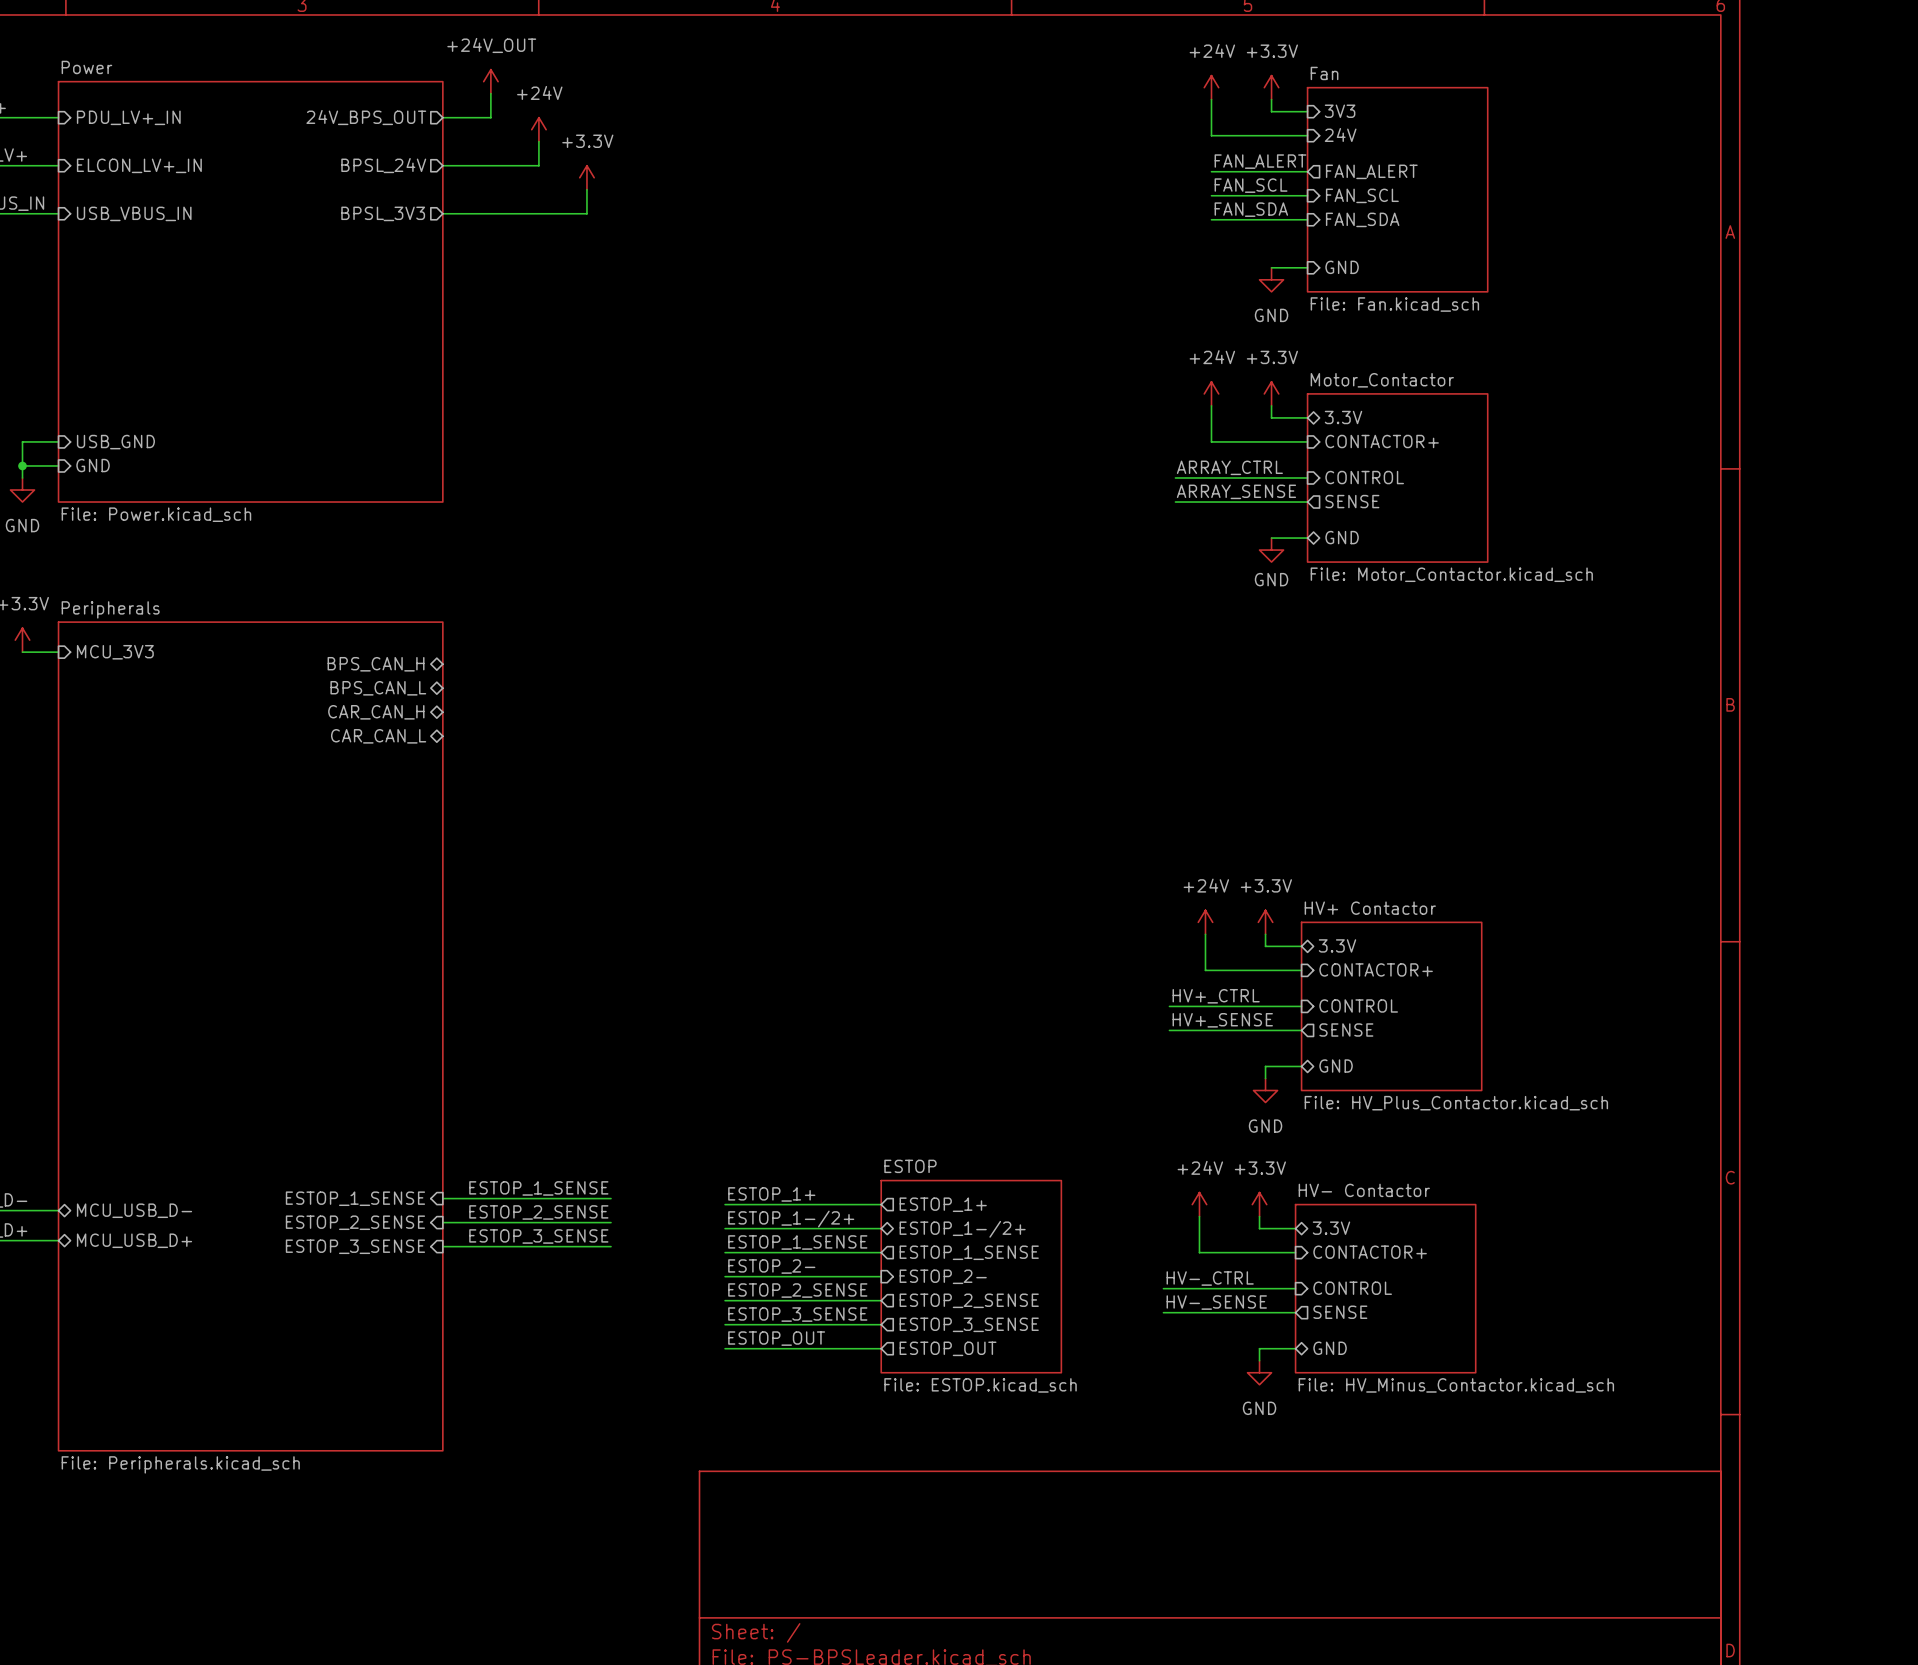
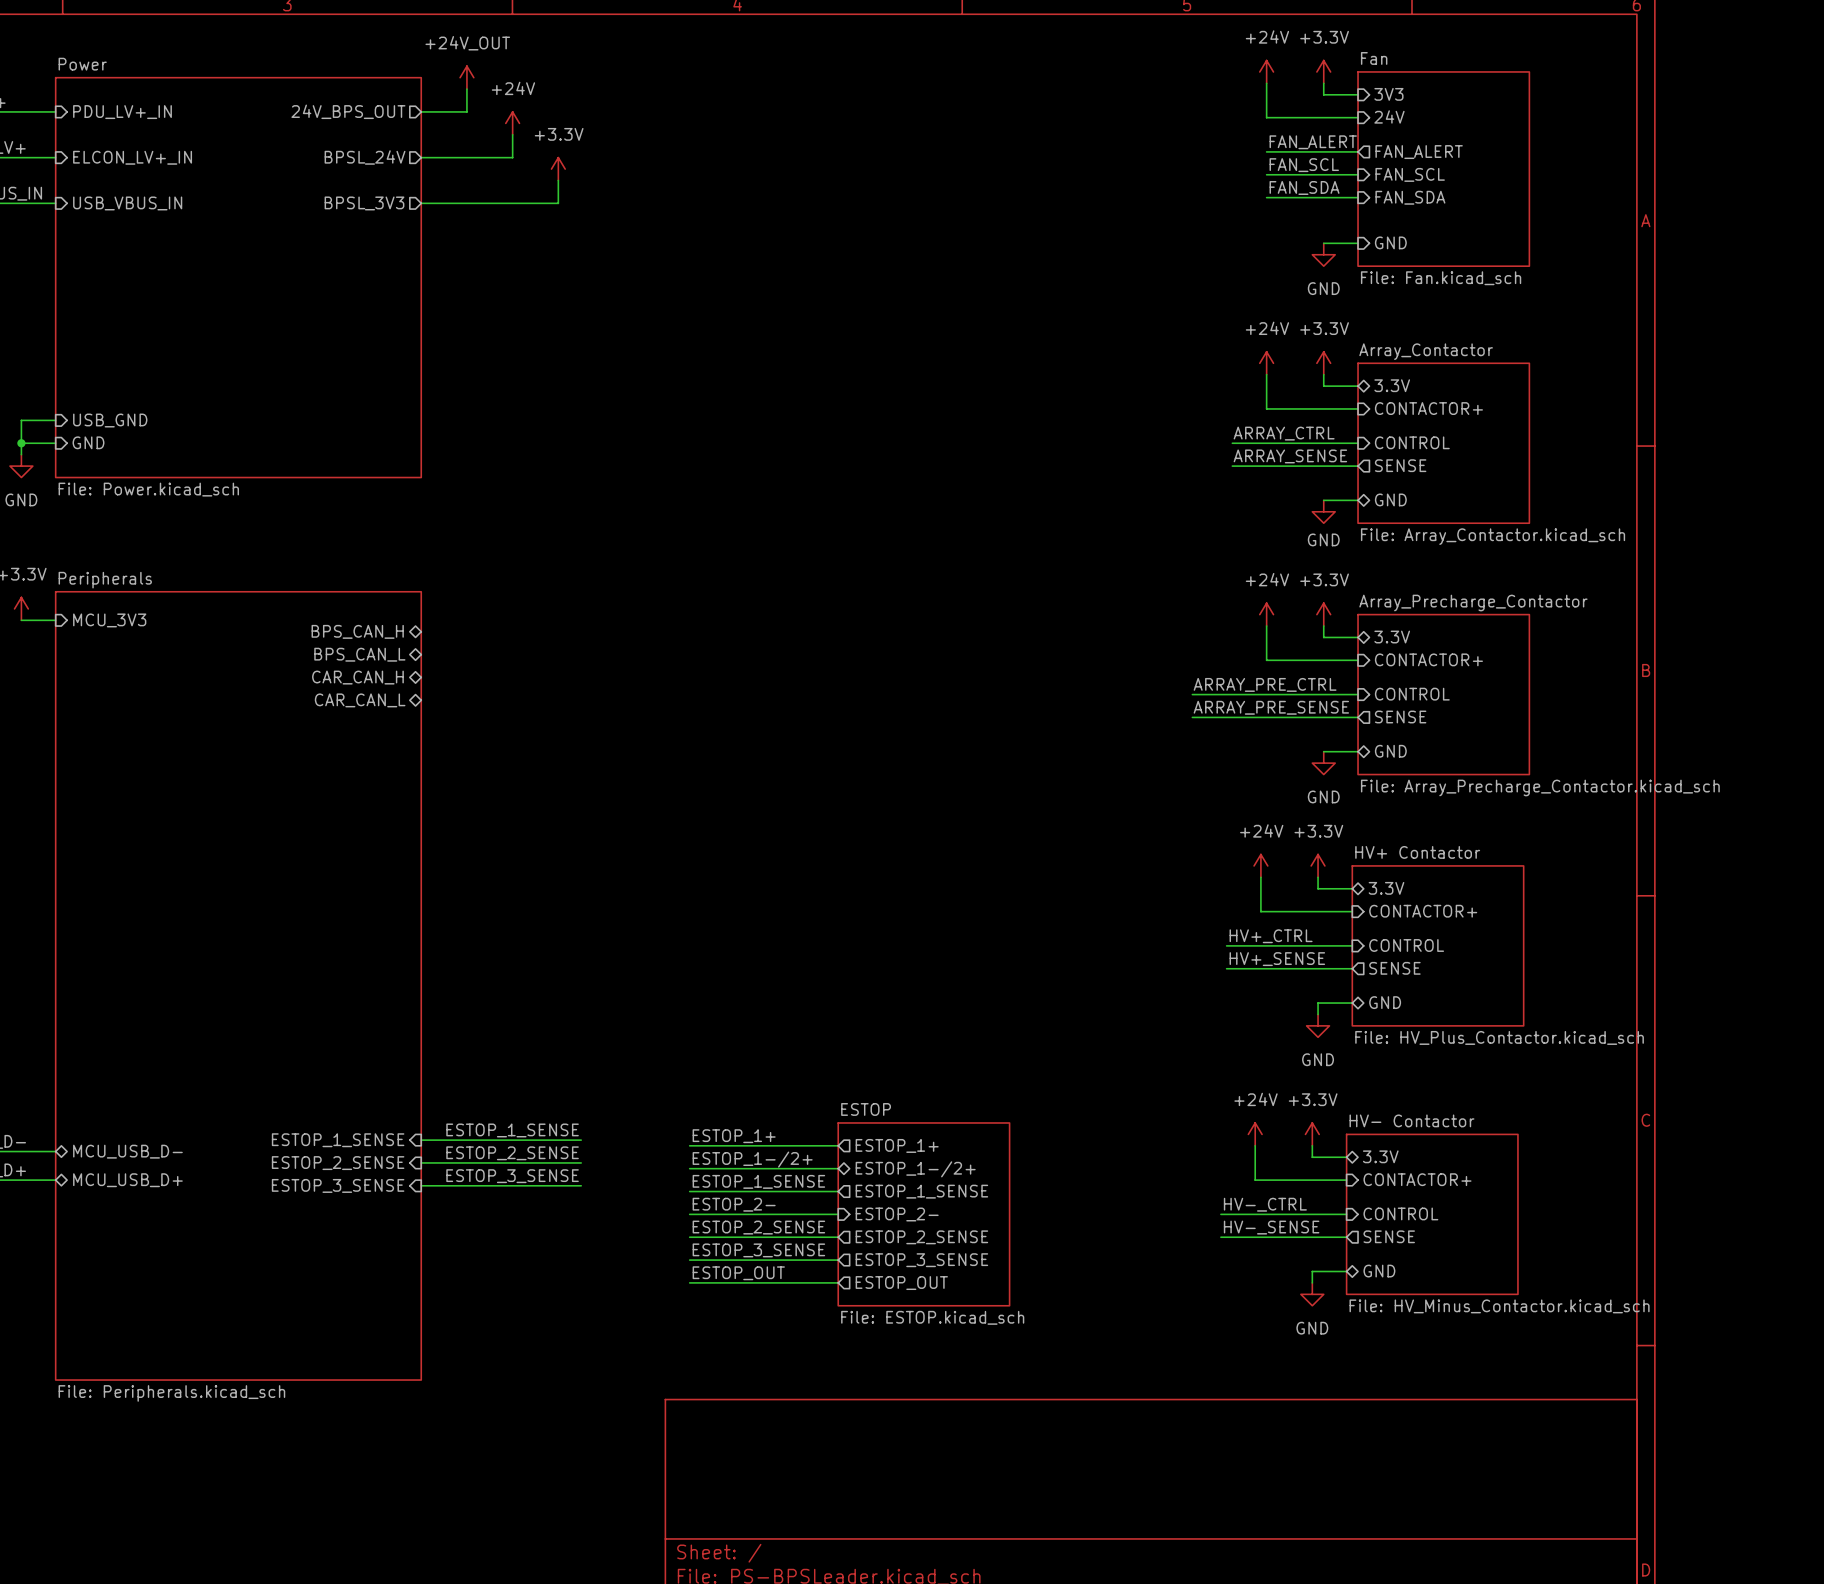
power symbol position: +24V (1211, 87) -> +24V (1266, 71)
power symbol position: +3.3V (1271, 87) -> +3.3V (1323, 71)
wire: (1211, 99) (1211, 135) (1307, 135) -> (1266, 83) (1266, 117) (1358, 117)
wire: (1271, 99) (1271, 111) (1307, 111) -> (1323, 83) (1323, 94) (1358, 94)
sheet pin position: 3V3 (1340, 111) -> 3V3 (1388, 94)
sheet pin position: 24V (1340, 134) -> 24V (1389, 116)
label position: FAN_ALERT (1260, 161) -> FAN_ALERT (1313, 142)
wire: (1211, 171) (1307, 171) -> (1266, 151) (1358, 151)
sheet pin position: FAN_ALERT (1371, 171) -> FAN_ALERT (1419, 152)
label position: FAN_SCL (1251, 185) -> FAN_SCL (1304, 165)
sheet Fan position: (1397, 189) -> (1443, 169)
wire: (1211, 195) (1307, 195) -> (1266, 174) (1358, 174)
sheet pin position: FAN_SCL (1362, 195) -> FAN_SCL (1410, 174)
label position: FAN_SDA (1251, 209) -> FAN_SDA (1304, 187)
wire: (1211, 219) (1307, 219) -> (1266, 197) (1358, 197)
sheet pin position: FAN_SDA (1362, 219) -> FAN_SDA (1410, 197)
wire: (1271, 267) (1307, 267) -> (1323, 243) (1358, 243)
sheet pin position: GND (1342, 267) -> GND (1390, 242)
power symbol position: GND (1271, 279) -> GND (1323, 254)
power symbol position: +24V (1211, 393) -> +24V (1266, 363)
power symbol position: +3.3V (1271, 393) -> +3.3V (1323, 363)
wire: (1211, 405) (1211, 441) (1307, 441) -> (1266, 374) (1266, 408) (1358, 408)
wire: (1271, 405) (1271, 417) (1307, 417) -> (1323, 374) (1323, 386) (1358, 386)
sheet pin position: 3.3V (1343, 417) -> 3.3V (1392, 385)
sheet pin position: CONTACTOR+ (1382, 441) -> CONTACTOR+ (1428, 408)
sheet Array_Contactor: none -> File: Array_Contactor.kicad_sch (1443, 443)
label position: ARRAY_CTRL (1229, 467) -> ARRAY_CTRL (1284, 433)
wire: (1175, 477) (1307, 477) -> (1232, 443) (1358, 443)
sheet pin position: CONTROL (1364, 477) -> CONTROL (1412, 442)
sheet Motor_Contactor: File: Motor_Contactor.kicad_sch (1397, 477) -> none
label position: ARRAY_SENSE (1236, 491) -> ARRAY_SENSE (1290, 456)
sheet pin position: SENSE (1352, 501) -> SENSE (1400, 465)
wire: (1175, 502) (1307, 502) -> (1232, 466) (1358, 466)
sheet pin position: GND (1342, 537) -> GND (1390, 499)
wire: (1271, 538) (1307, 538) -> (1323, 500) (1358, 500)
power symbol position: GND (1271, 550) -> GND (1323, 511)
power symbol: none -> +24V (1266, 614)
power symbol: none -> +3.3V (1323, 614)
wire: none -> (1266, 626) (1266, 660) (1358, 660)
wire: none -> (1323, 626) (1323, 637) (1358, 637)
sheet pin: none -> 3.3V (1392, 637)
sheet pin: none -> CONTACTOR+ (1428, 659)
label: none -> ARRAY_PRE_CTRL (1265, 684)
sheet pin: none -> CONTROL (1412, 694)
wire: none -> (1192, 694) (1358, 694)
sheet Array_Precharge_Contactor: none -> File: Array_Precharge_Contactor.kicad_sch (1443, 694)
label: none -> ARRAY_PRE_SENSE (1271, 707)
sheet pin: none -> SENSE (1400, 717)
wire: none -> (1192, 717) (1358, 717)
sheet pin: none -> GND (1390, 751)
wire: none -> (1323, 751) (1358, 751)
power symbol: none -> GND (1323, 763)
power symbol position: +24V (1205, 922) -> +24V (1260, 865)
power symbol position: +3.3V (1265, 922) -> +3.3V (1318, 865)
wire: (1205, 934) (1205, 970) (1301, 970) -> (1260, 877) (1260, 911) (1352, 911)
wire: (1265, 934) (1265, 946) (1301, 946) -> (1318, 877) (1318, 888) (1352, 888)
sheet pin position: 3.3V (1337, 945) -> 3.3V (1386, 888)
sheet pin position: CONTACTOR+ (1376, 969) -> CONTACTOR+ (1423, 911)
label position: HV+_CTRL (1216, 996) -> HV+_CTRL (1271, 936)
sheet pin position: CONTROL (1358, 1005) -> CONTROL (1406, 945)
wire: (1169, 1006) (1301, 1006) -> (1226, 945) (1352, 945)
sheet HV+ Contactor position: (1391, 1006) -> (1437, 945)
label position: HV+_SENSE (1222, 1020) -> HV+_SENSE (1277, 959)
wire: (1169, 1030) (1301, 1030) -> (1226, 968) (1352, 968)
sheet pin position: SENSE (1346, 1030) -> SENSE (1394, 968)
wire: (1301, 1066) (1265, 1066) (1265, 1078) -> (1352, 1003) (1318, 1003) (1318, 1014)
sheet pin position: GND (1336, 1066) -> GND (1385, 1002)
power symbol position: GND (1265, 1090) -> GND (1318, 1025)
power symbol position: +24V (1199, 1204) -> +24V (1255, 1134)
power symbol position: +3.3V (1259, 1204) -> +3.3V (1312, 1134)
wire: (1199, 1216) (1199, 1252) (1295, 1252) -> (1255, 1145) (1255, 1180) (1346, 1180)
wire: (1259, 1216) (1259, 1228) (1295, 1228) -> (1312, 1145) (1312, 1157) (1346, 1157)
sheet pin position: 3.3V (1331, 1228) -> 3.3V (1380, 1156)
sheet pin position: CONTACTOR+ (1370, 1252) -> CONTACTOR+ (1417, 1179)
label position: HV-_CTRL (1210, 1278) -> HV-_CTRL (1265, 1204)
wire: (1163, 1288) (1295, 1288) -> (1220, 1214) (1346, 1214)
sheet pin position: CONTROL (1352, 1288) -> CONTROL (1400, 1213)
sheet HV- Contactor position: (1385, 1288) -> (1432, 1214)
label position: HV-_SENSE (1216, 1302) -> HV-_SENSE (1271, 1227)
wire: (1163, 1312) (1295, 1312) -> (1220, 1237) (1346, 1237)
sheet pin position: SENSE (1340, 1312) -> SENSE (1389, 1236)
wire: (1295, 1348) (1259, 1348) (1259, 1360) -> (1346, 1271) (1312, 1271) (1312, 1282)
sheet pin position: GND (1330, 1348) -> GND (1379, 1271)
power symbol position: GND (1259, 1372) -> GND (1312, 1294)

